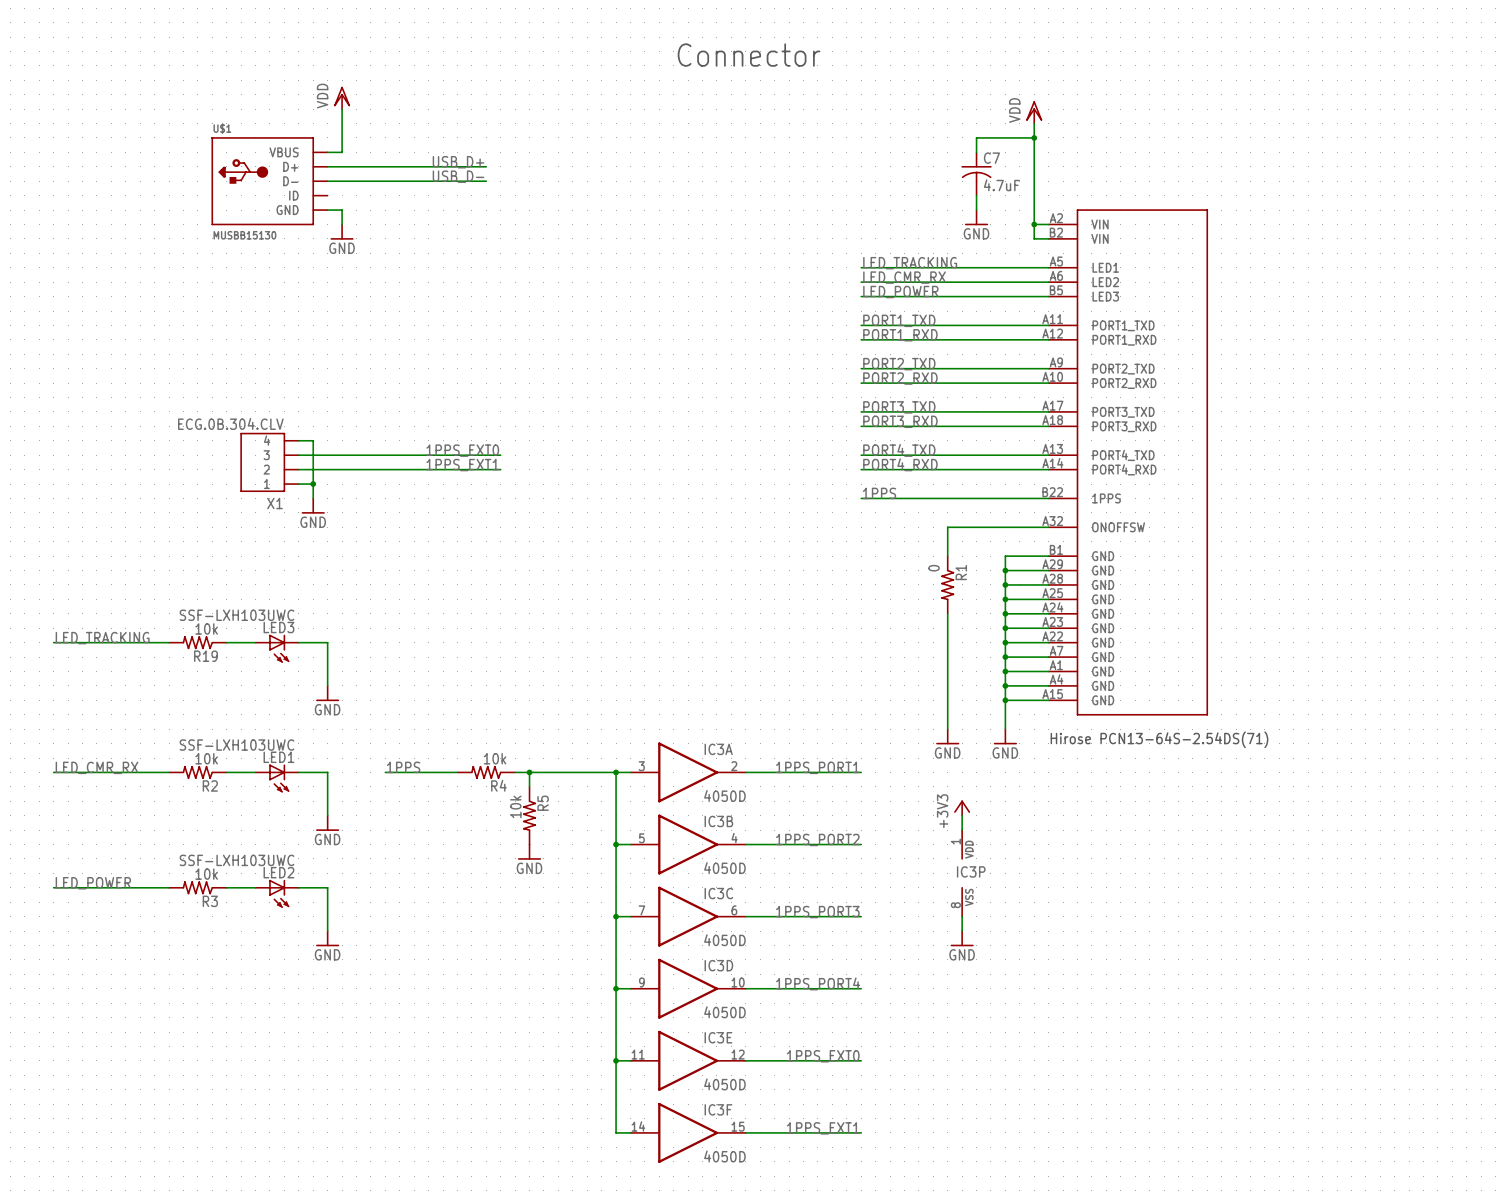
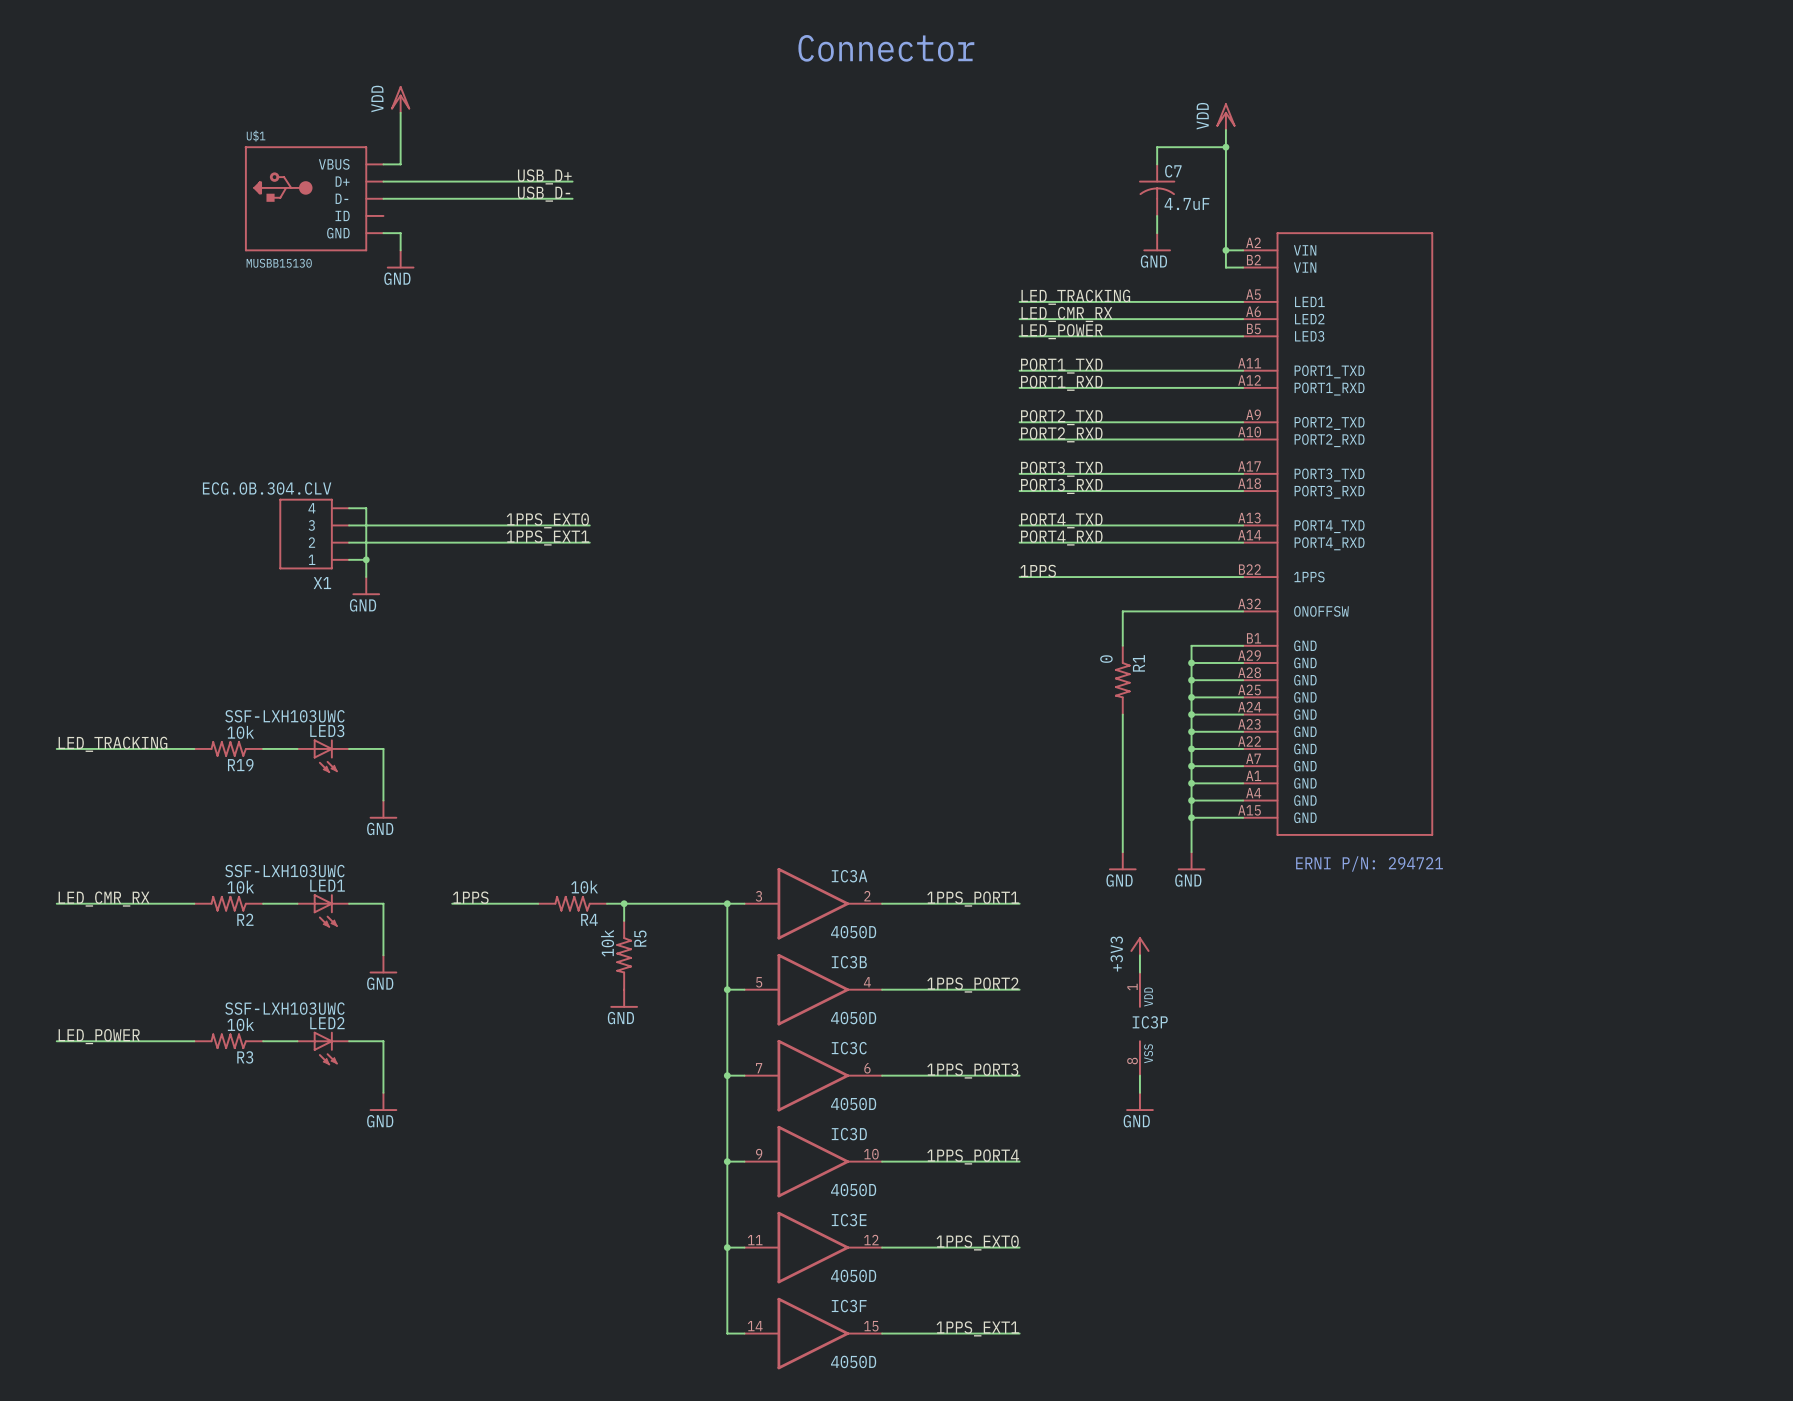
text: none -> ERNI P/N: 294721 (1369, 863)
text: Hirose PCN13-64S-2.54DS(71) (1159, 739) -> none

